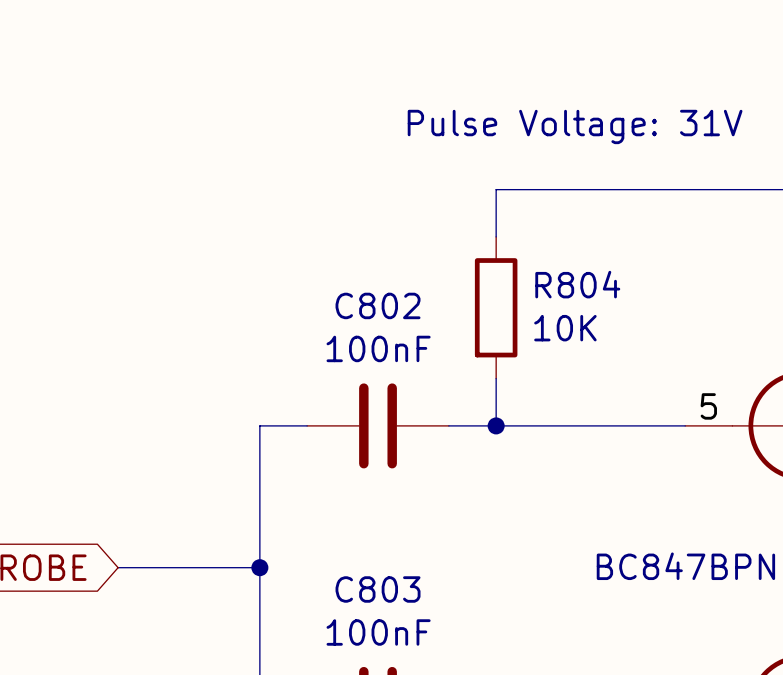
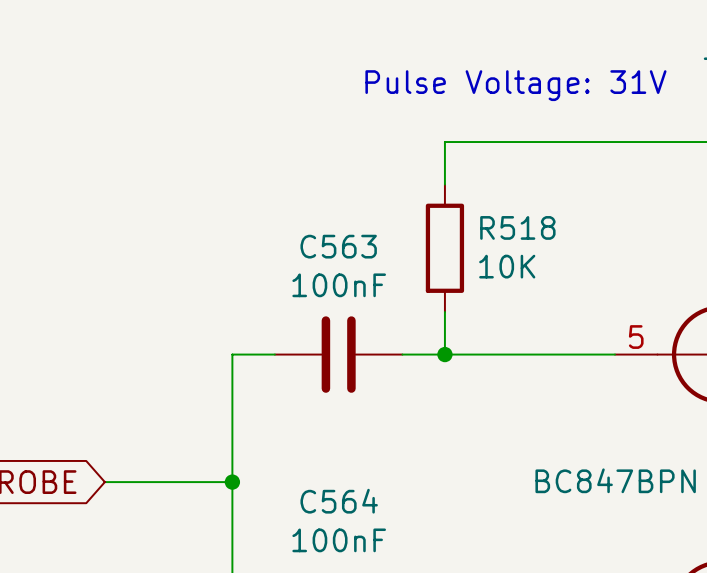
R804 name: R804 (577, 284) -> R518 (517, 227)
C802 name: C802 (378, 305) -> C563 (338, 246)
C803 name: C803 (378, 589) -> C564 (339, 501)

